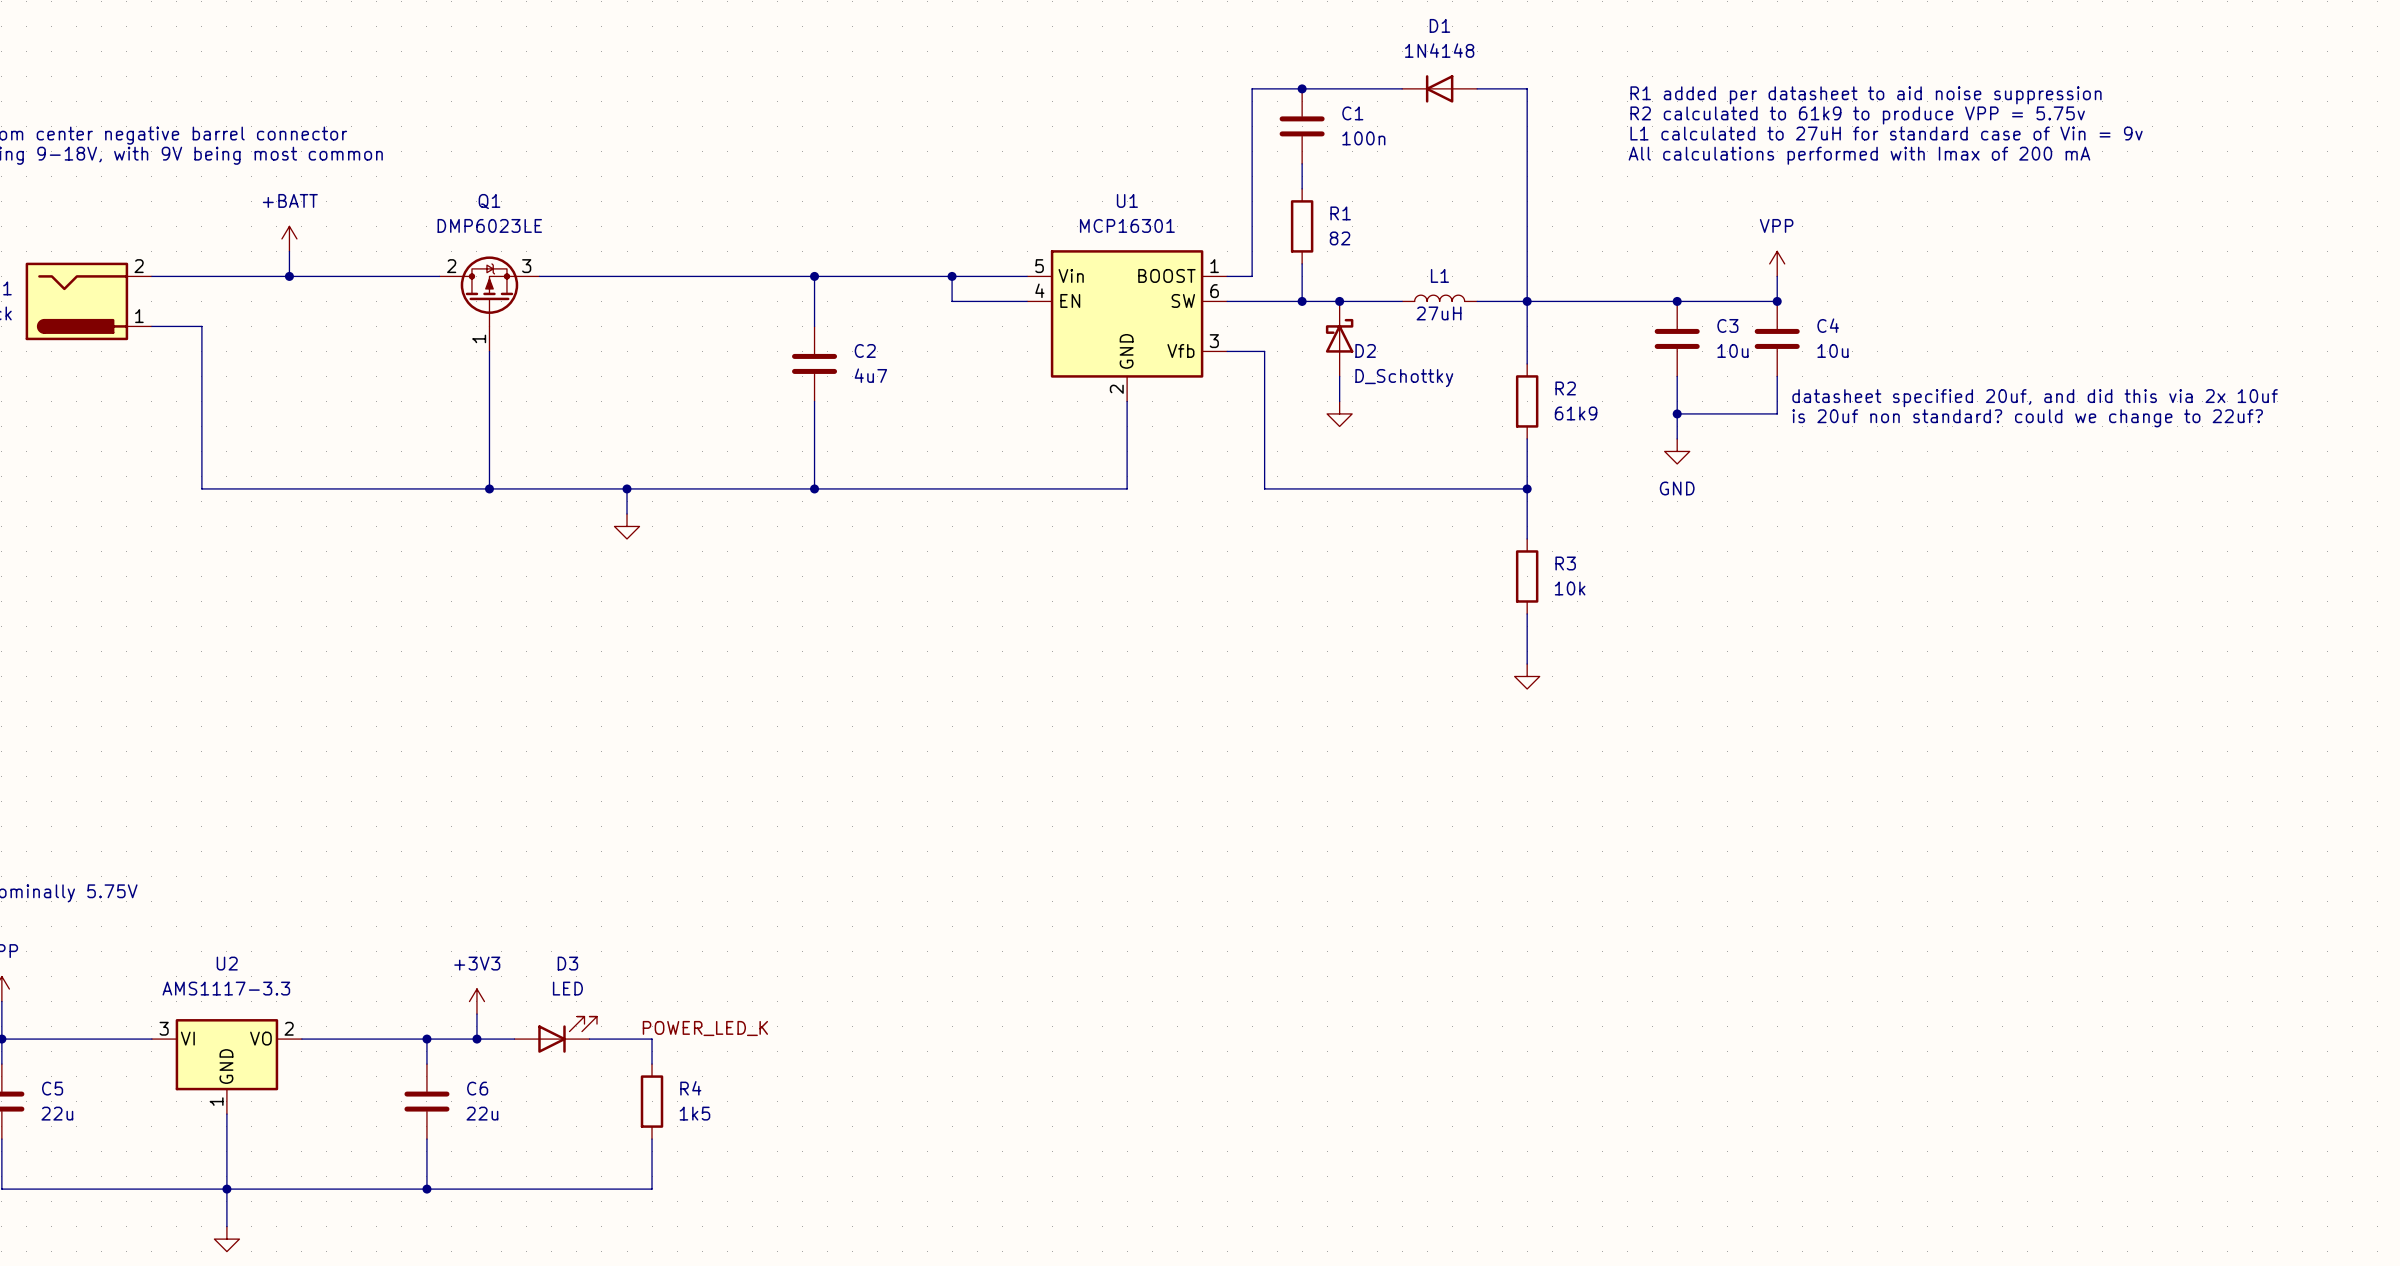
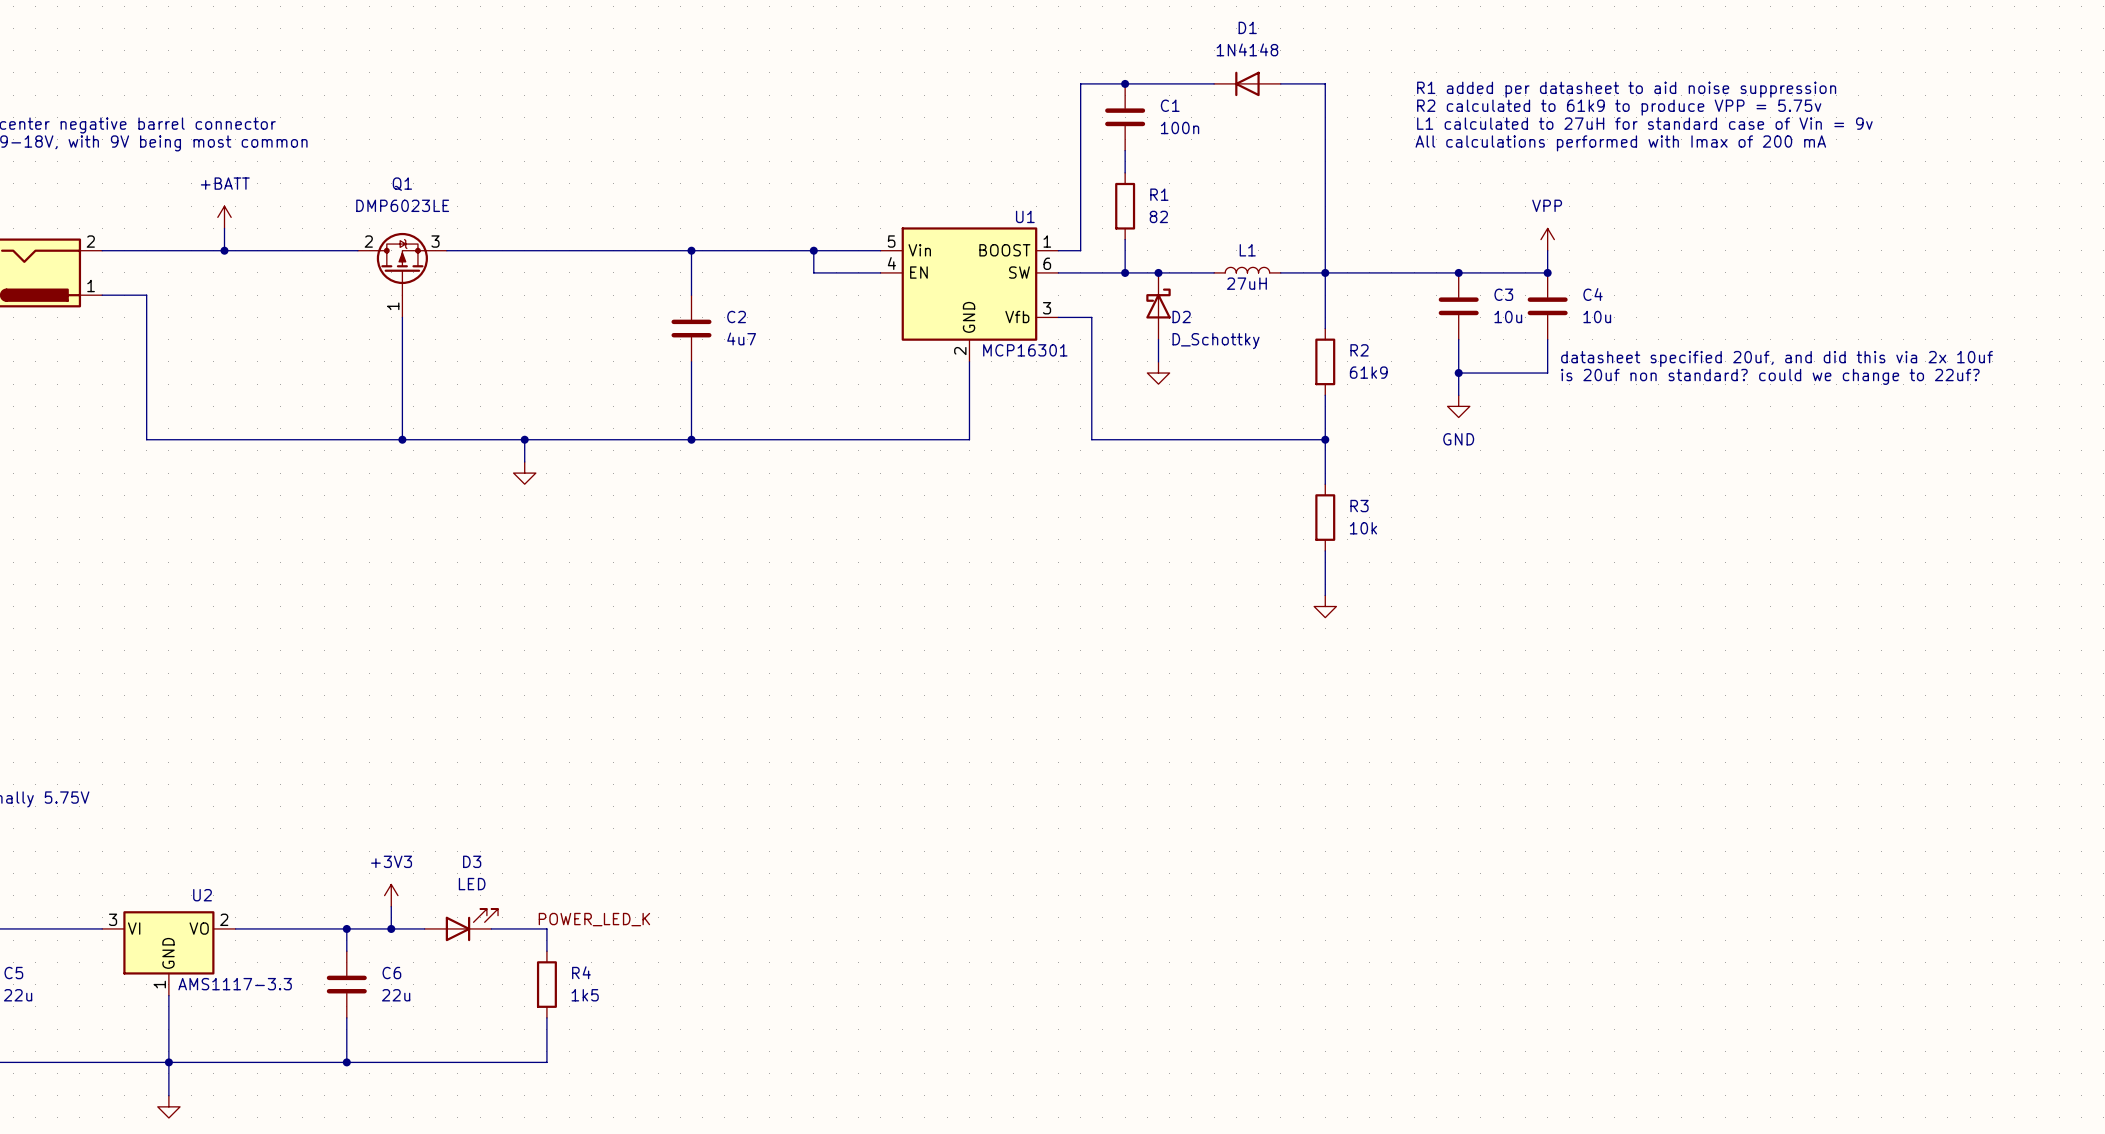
U1 name position: U1 (1127, 200) -> U1 (1025, 216)
U1 value position: MCP16301 (1127, 225) -> MCP16301 (1025, 350)
U2 name position: U2 (227, 963) -> U2 (202, 895)
U2 value position: AMS1117-3.3 (226, 988) -> AMS1117-3.3 (235, 984)

